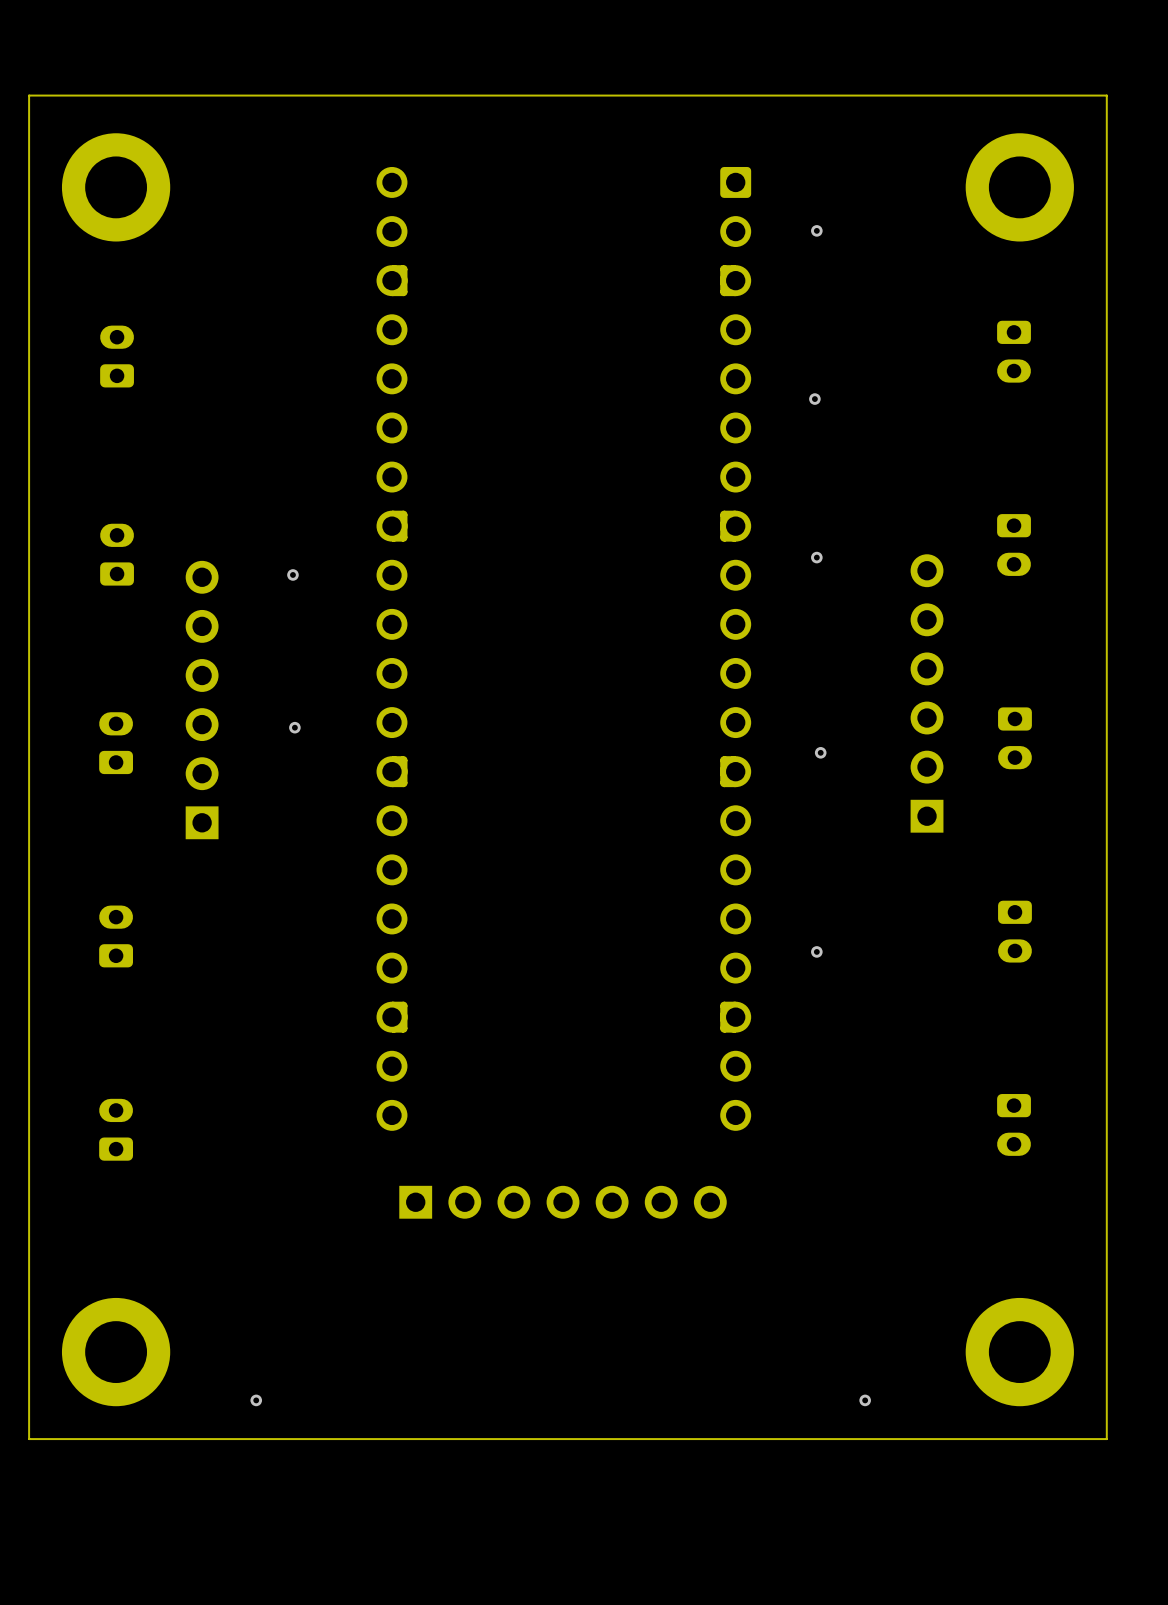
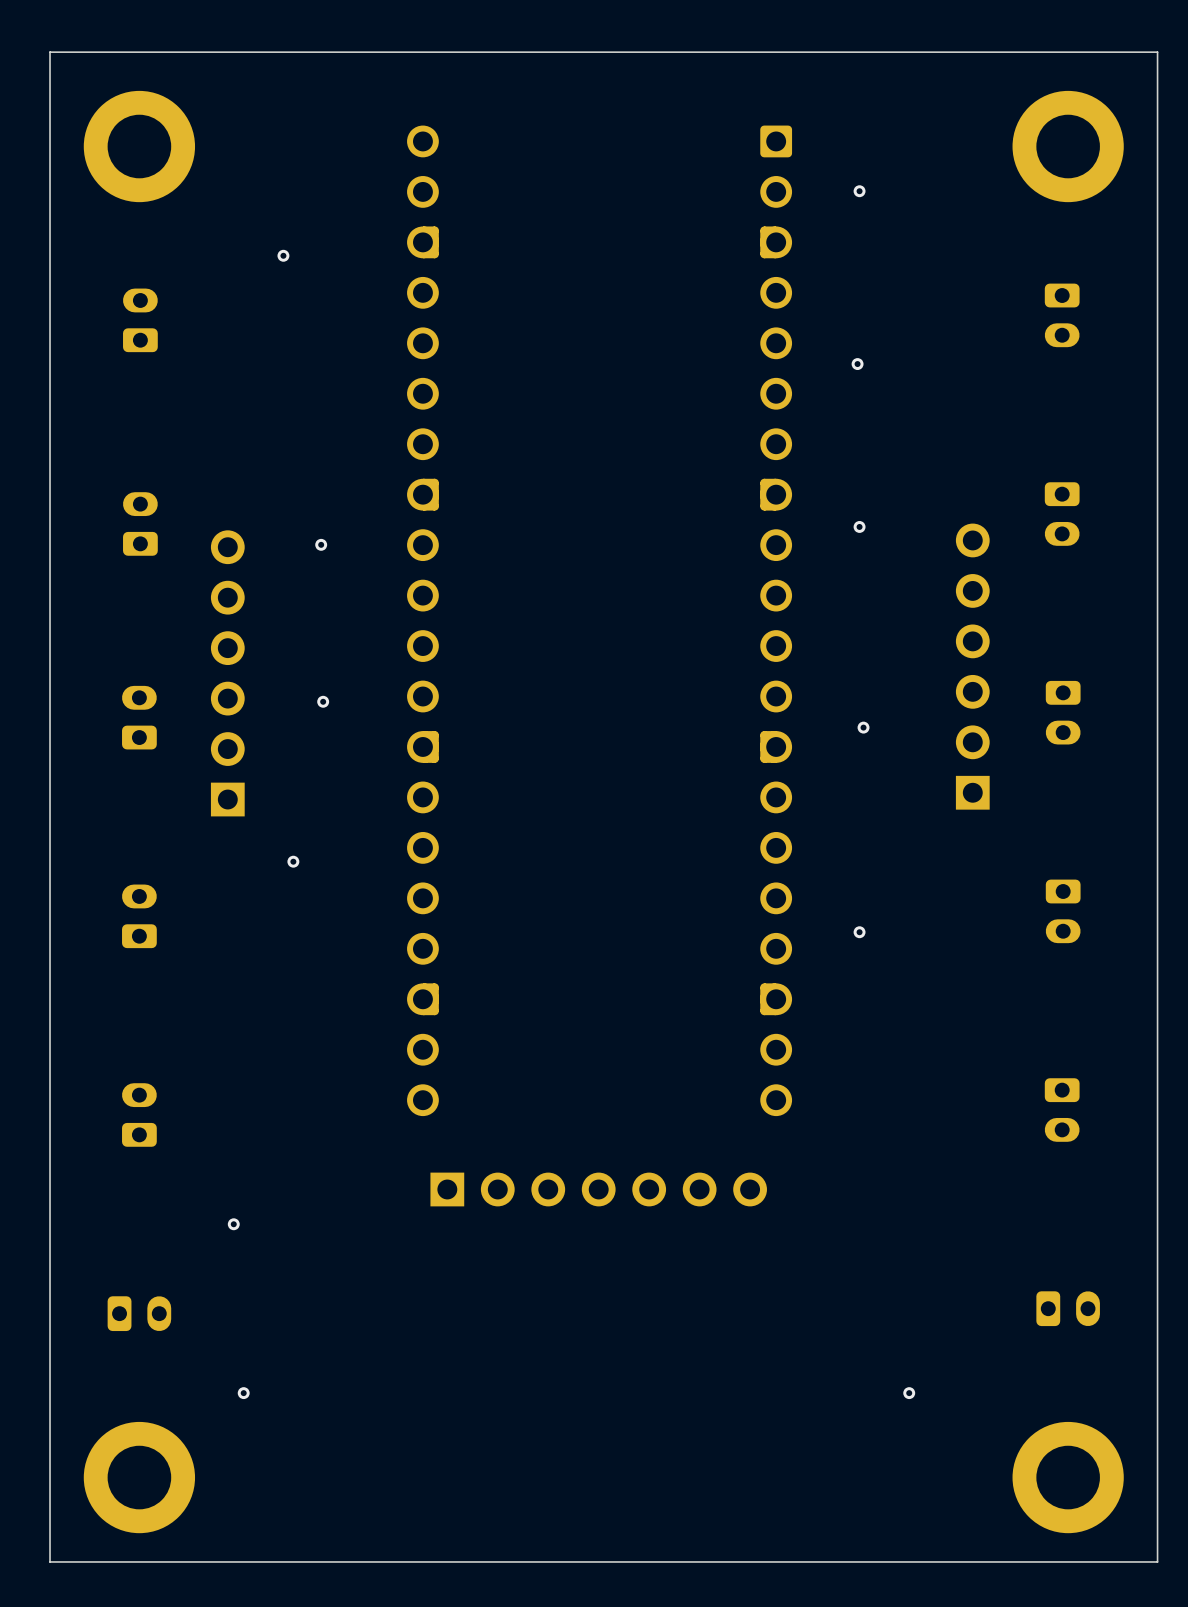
via: none -> (283, 255)
via: none -> (293, 861)
via: none -> (233, 1224)
part: none -> (1068, 1308)
part: none -> (139, 1313)
part position: (116, 1352) -> (139, 1477)
part position: (1019, 1352) -> (1068, 1477)
via position: (256, 1400) -> (243, 1393)
board edge: (1106, 1439) (29, 1439) -> (1157, 1432) (1157, 1561) (50, 1561) (50, 1432)

